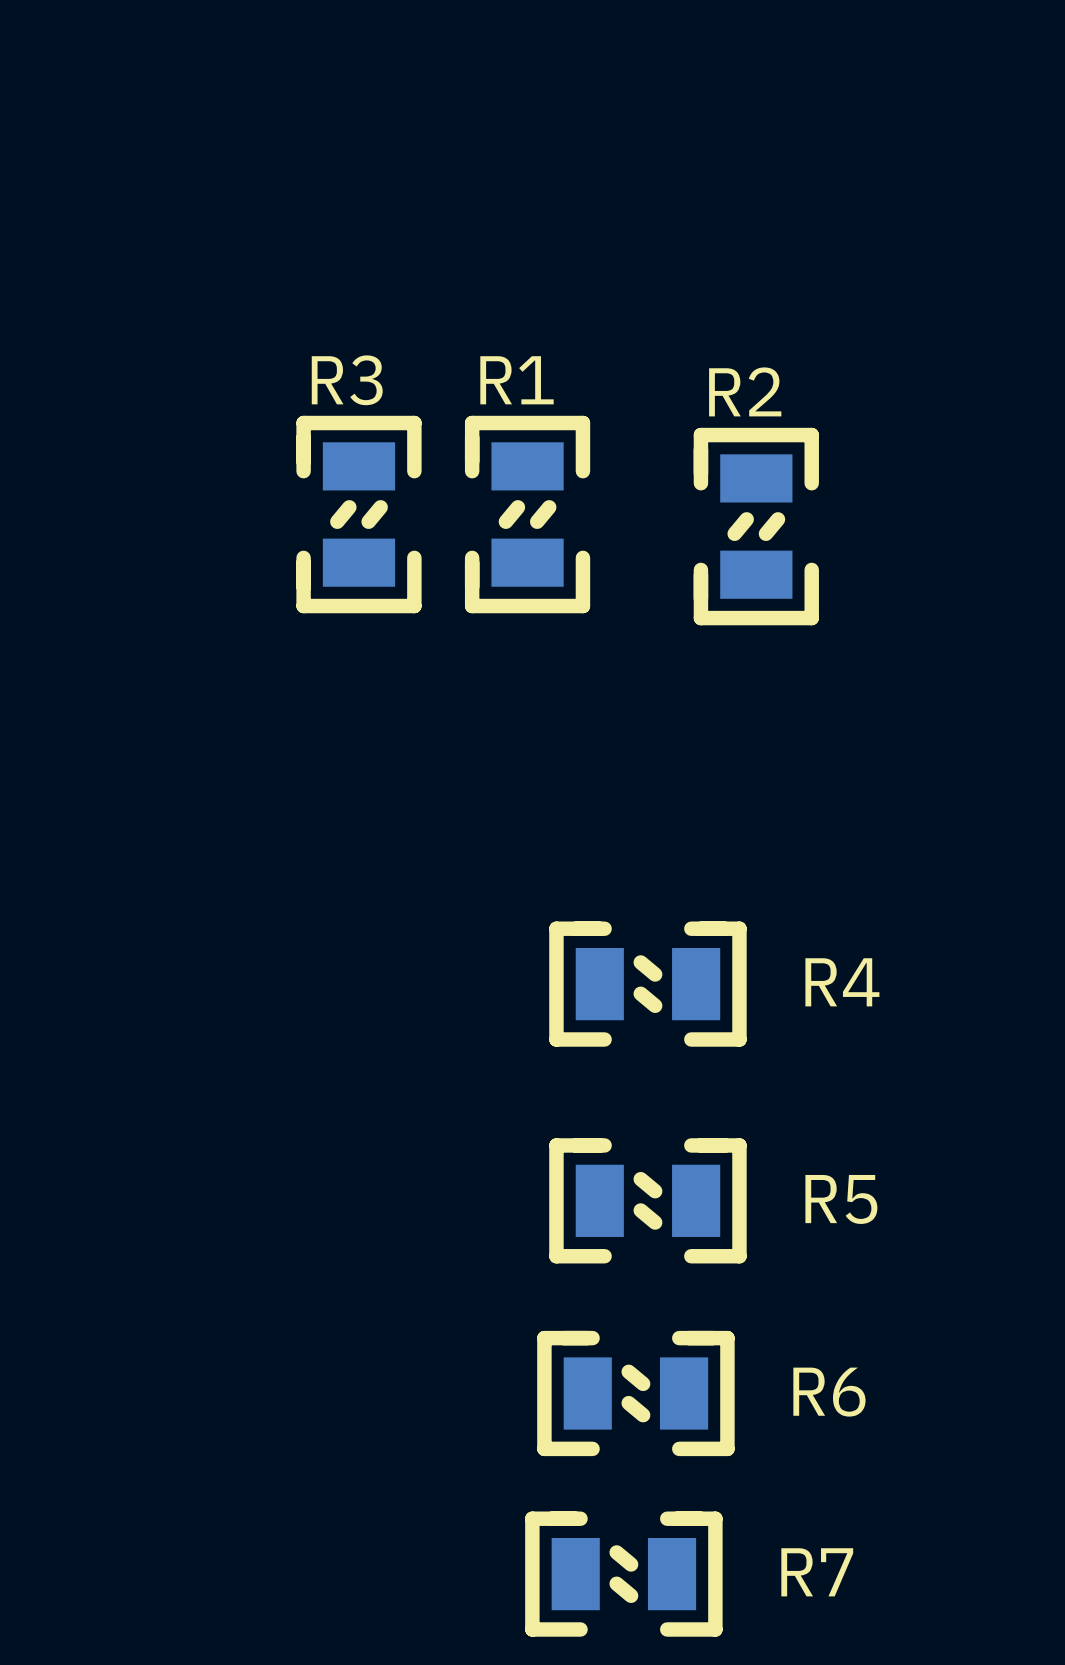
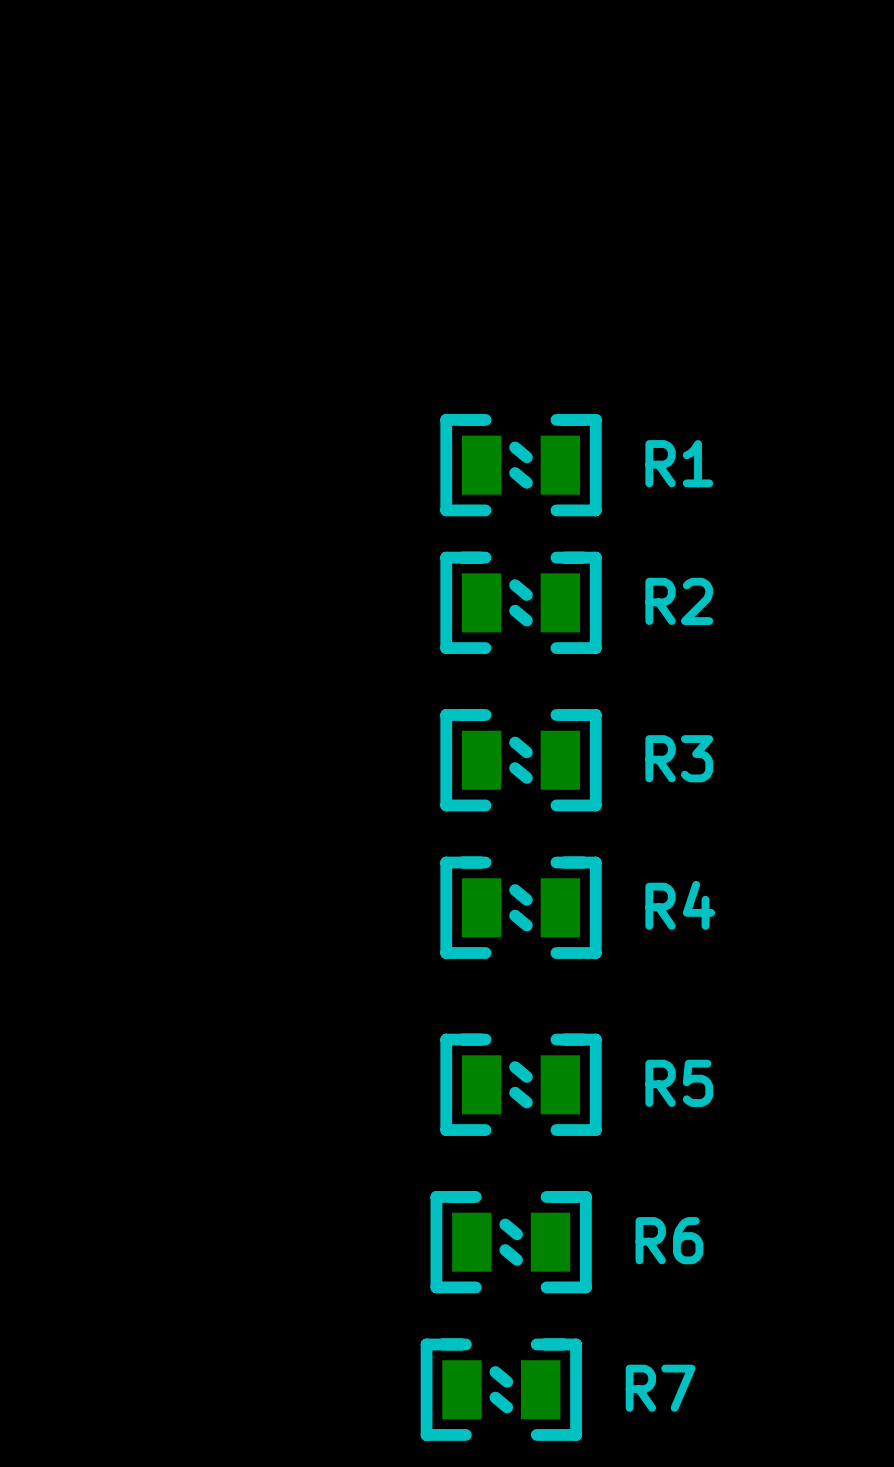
R3 rotation: 0° (358, 514) -> 90° clockwise (520, 760)
R3 position: (358, 514) -> (520, 760)
R1 rotation: 0° (527, 514) -> 90° clockwise (520, 465)
R1 position: (527, 514) -> (520, 465)
R2 rotation: 0° (756, 526) -> 90° clockwise (520, 602)
R2 position: (756, 526) -> (520, 602)

